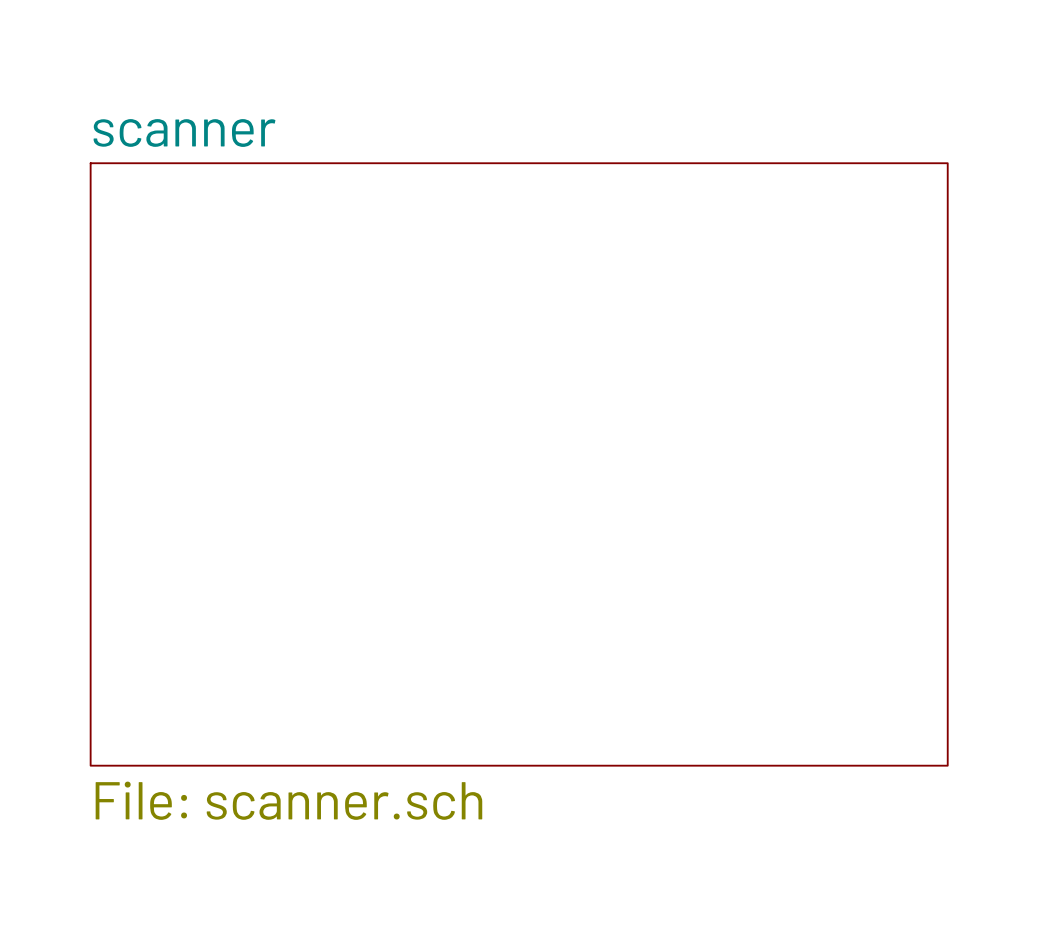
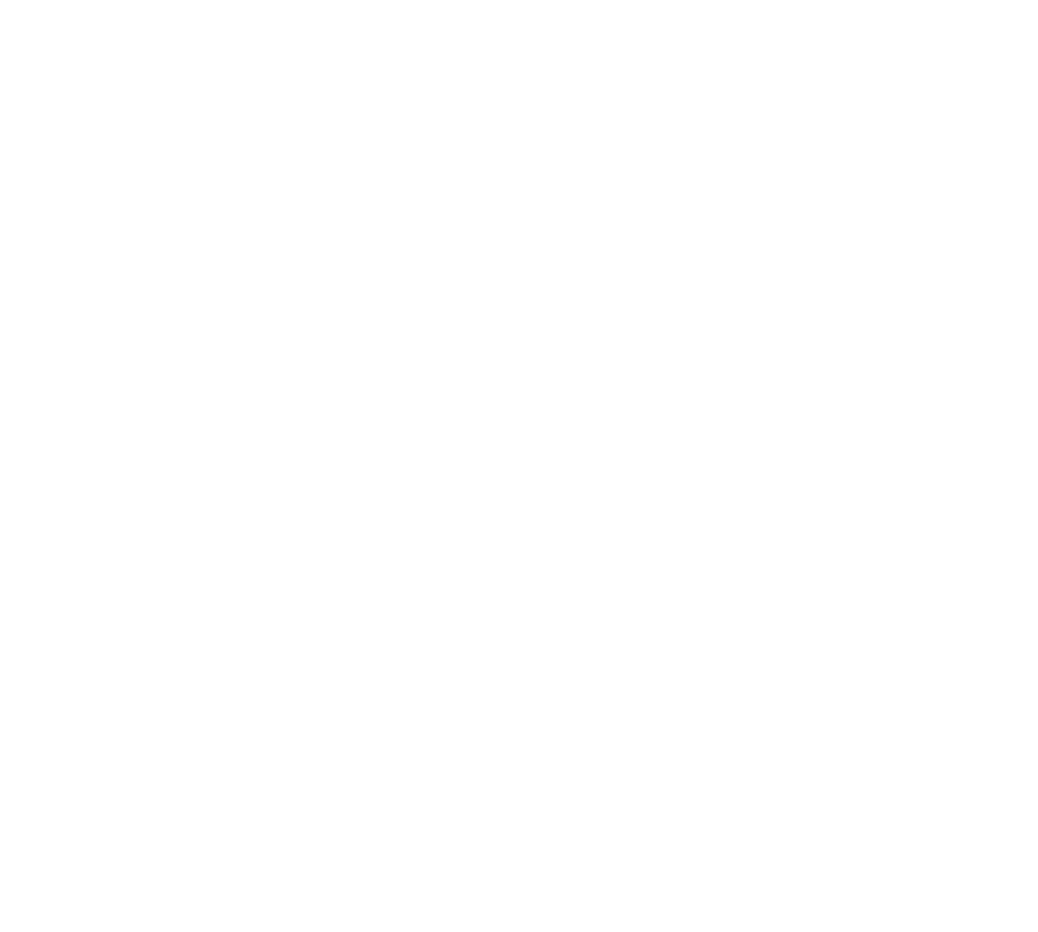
sheet scanner: File: scanner.sch (519, 464) -> none

